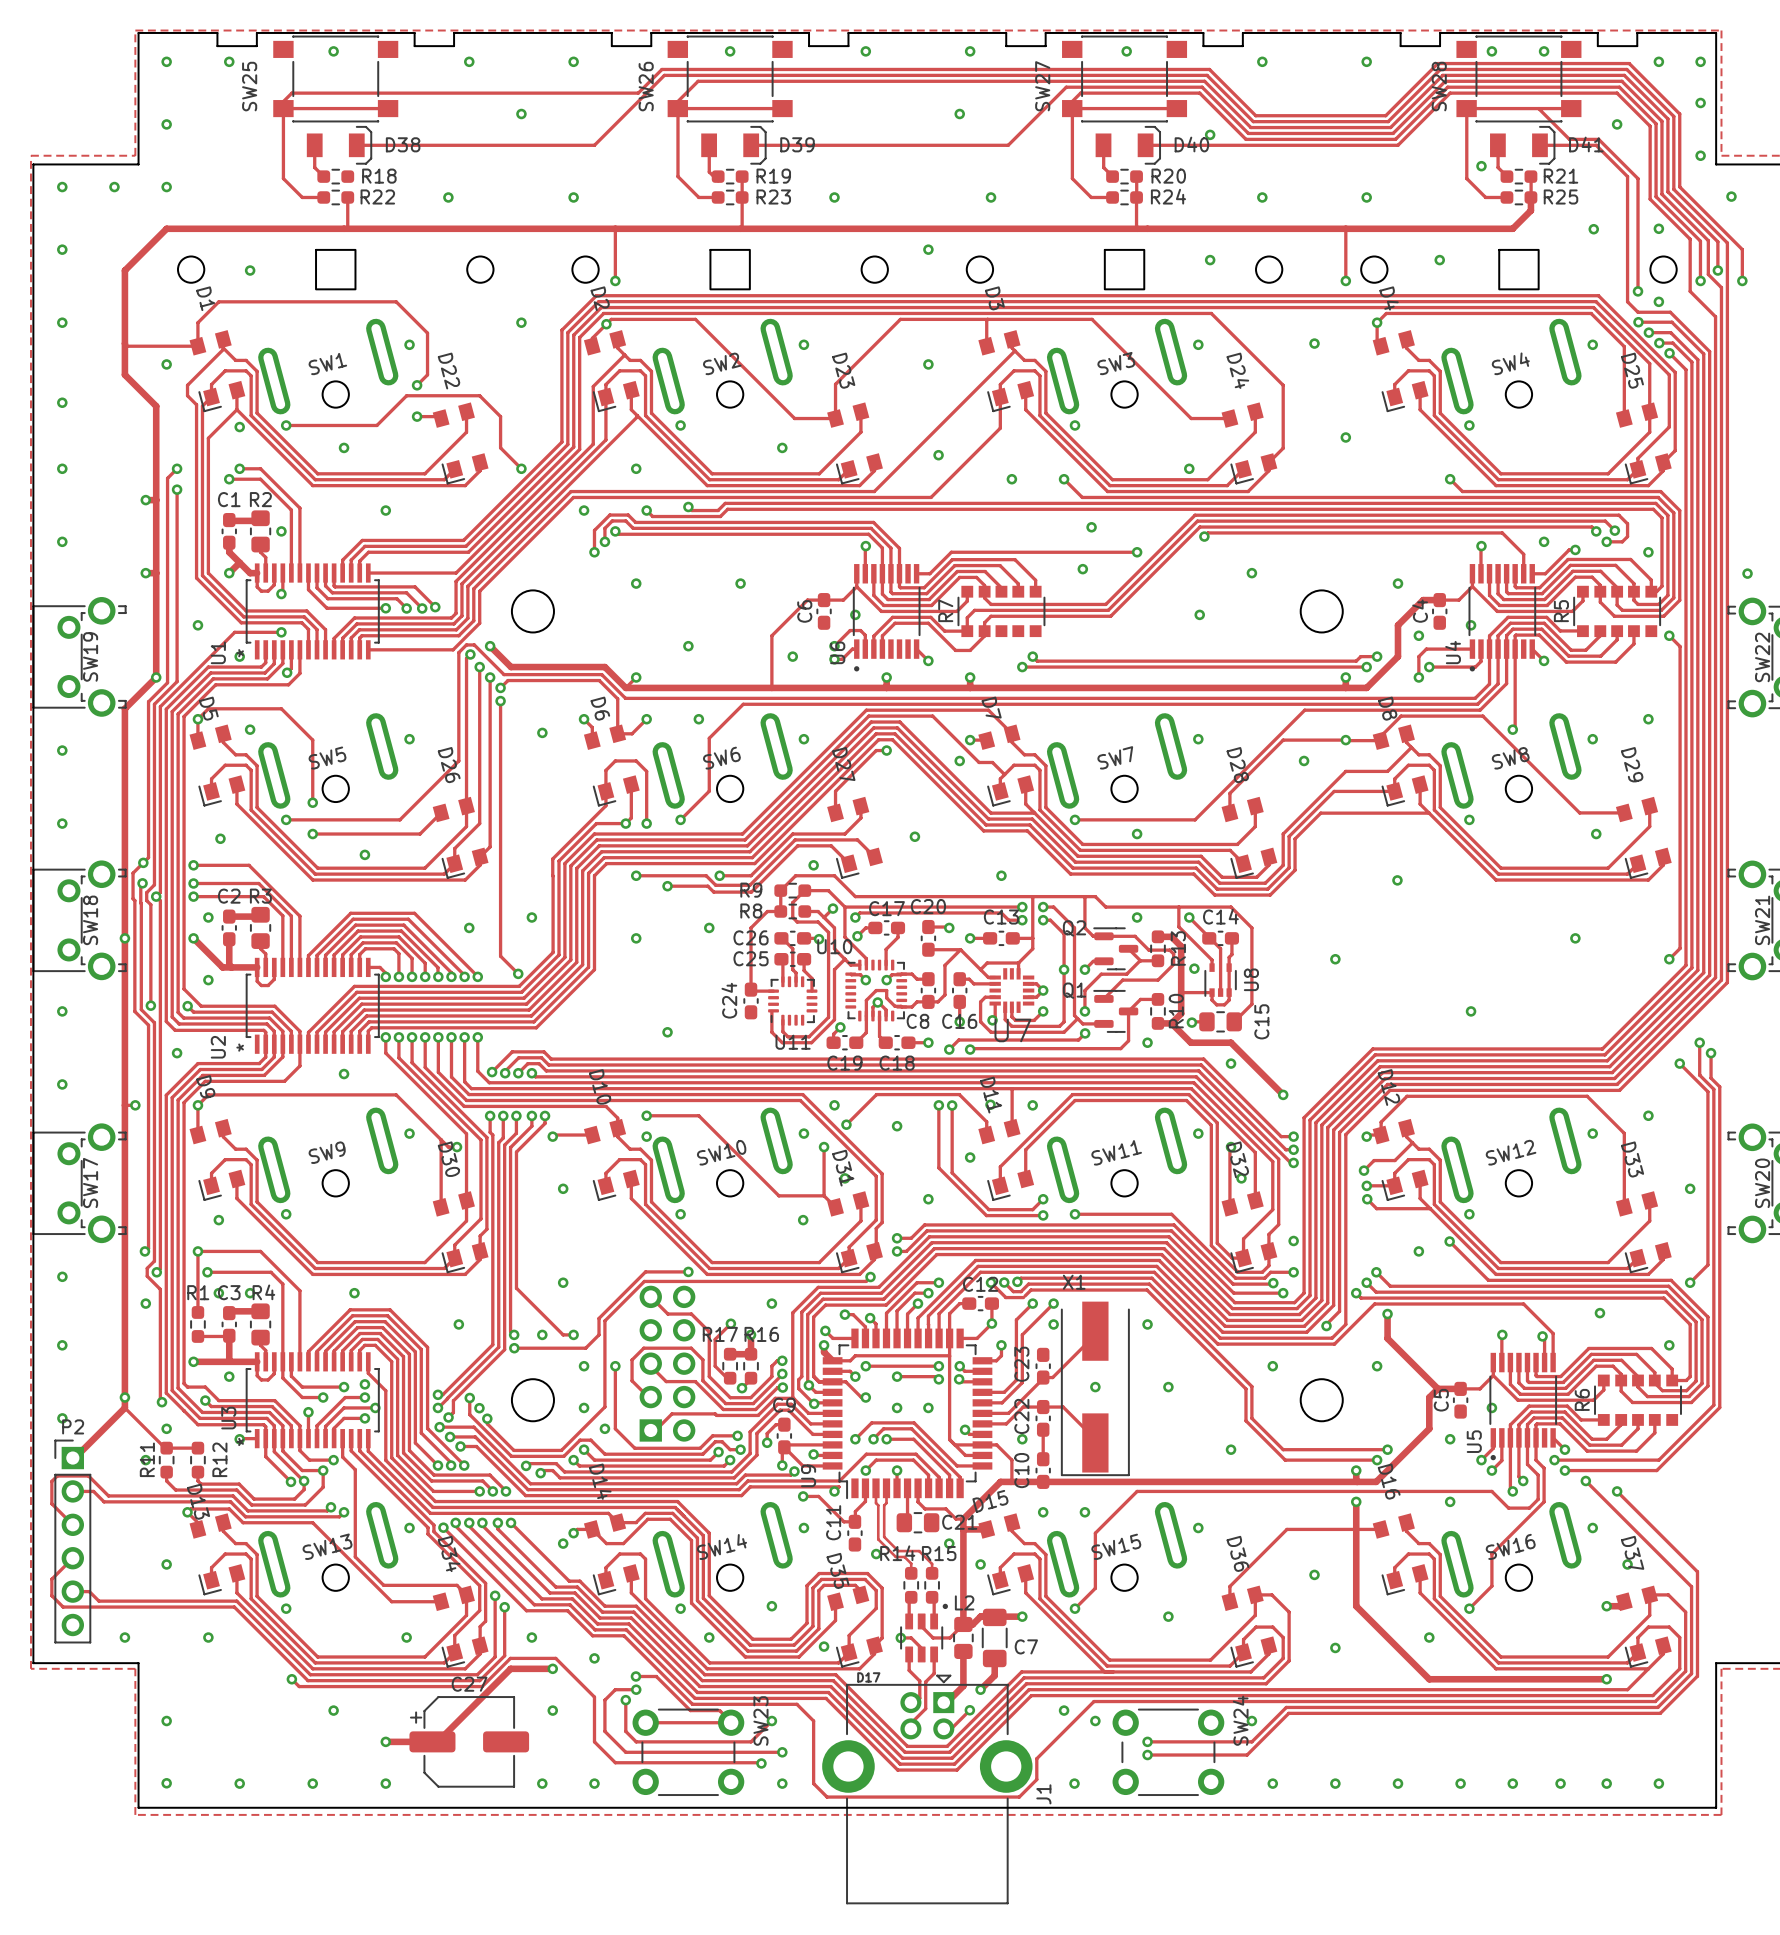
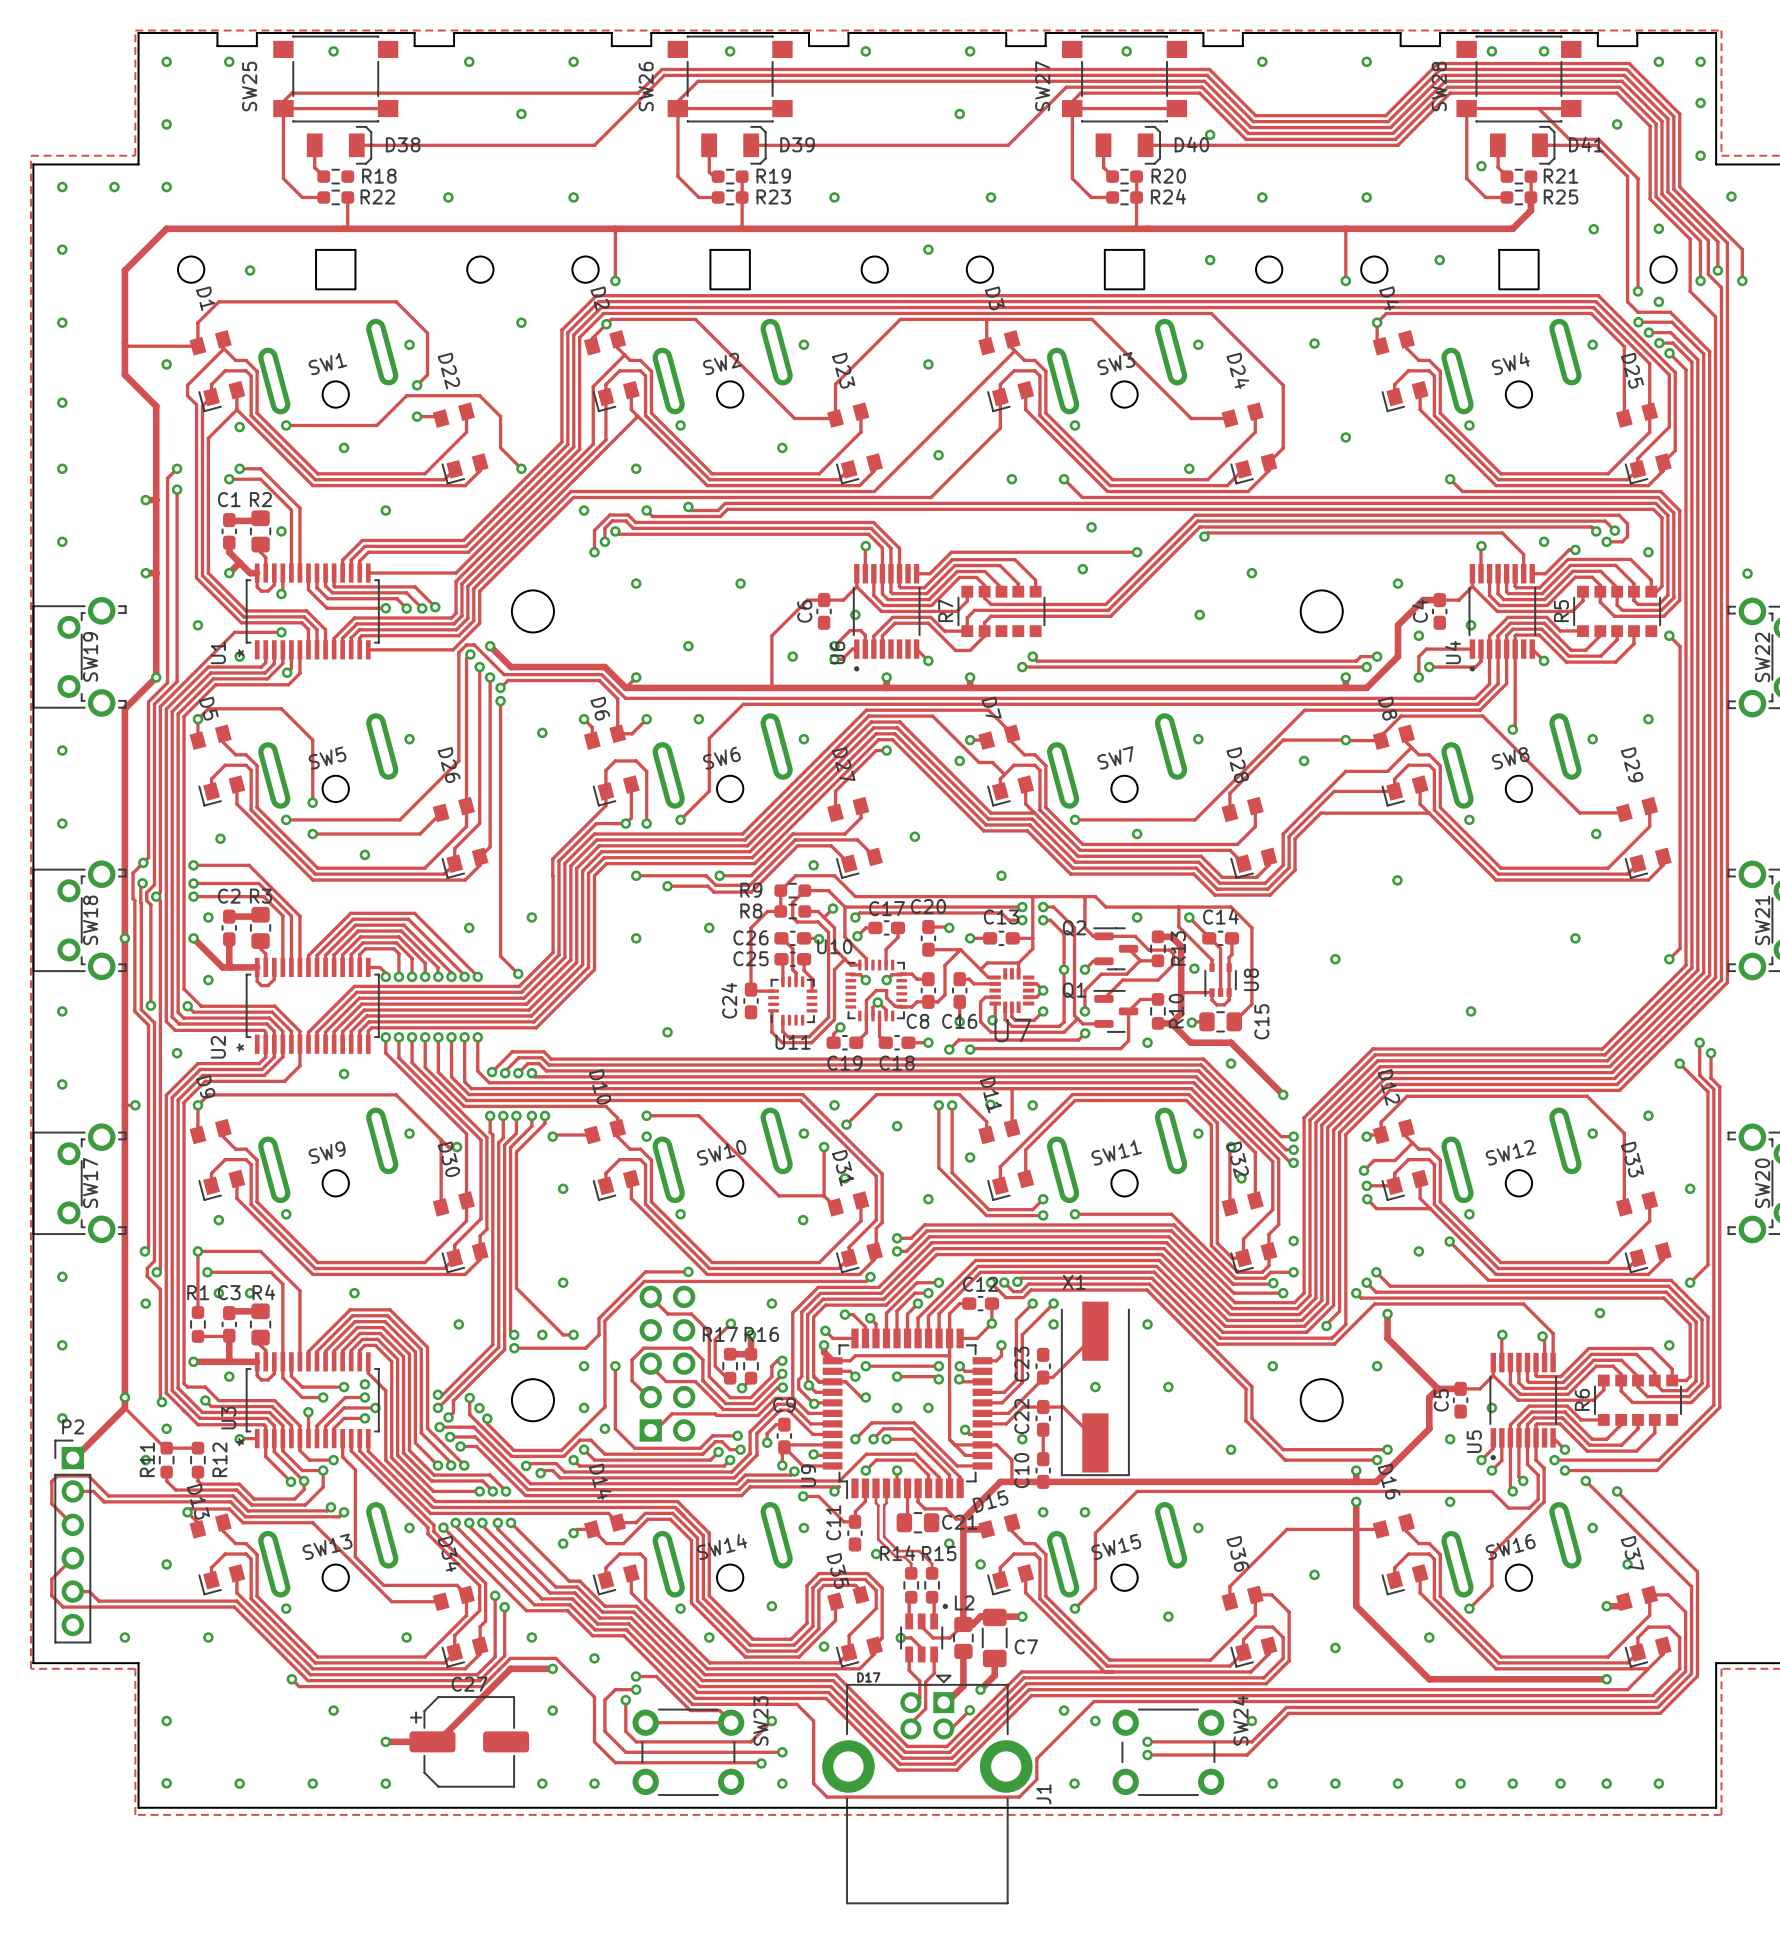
via: (250, 729) -> none

